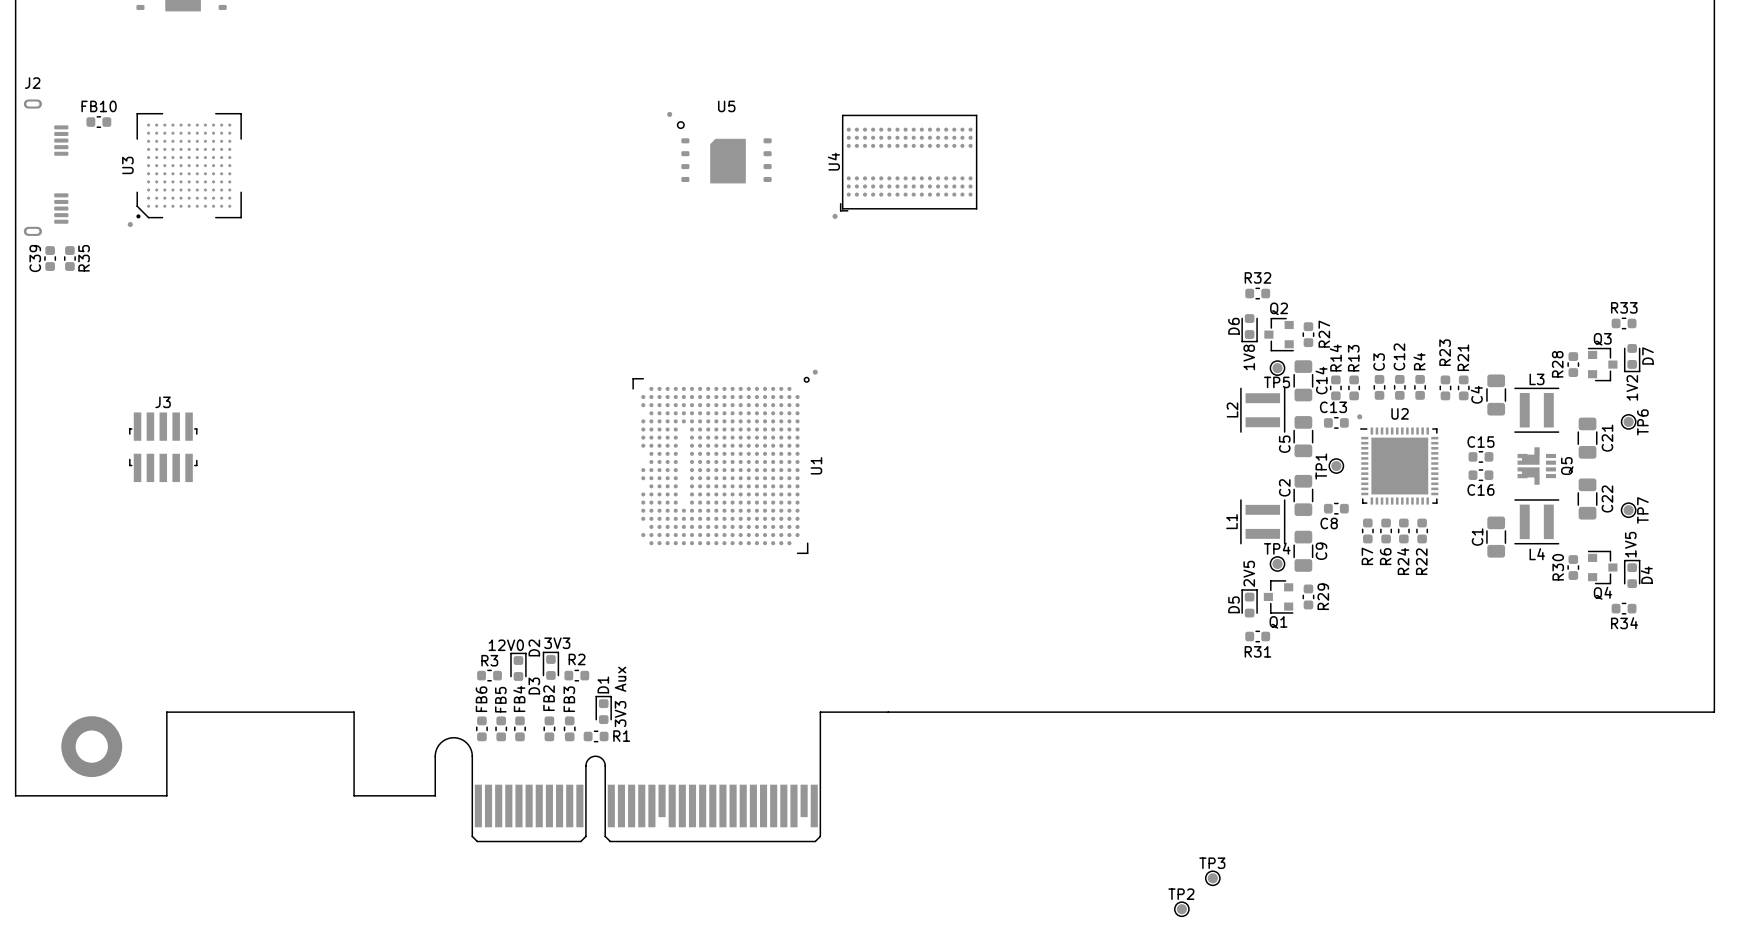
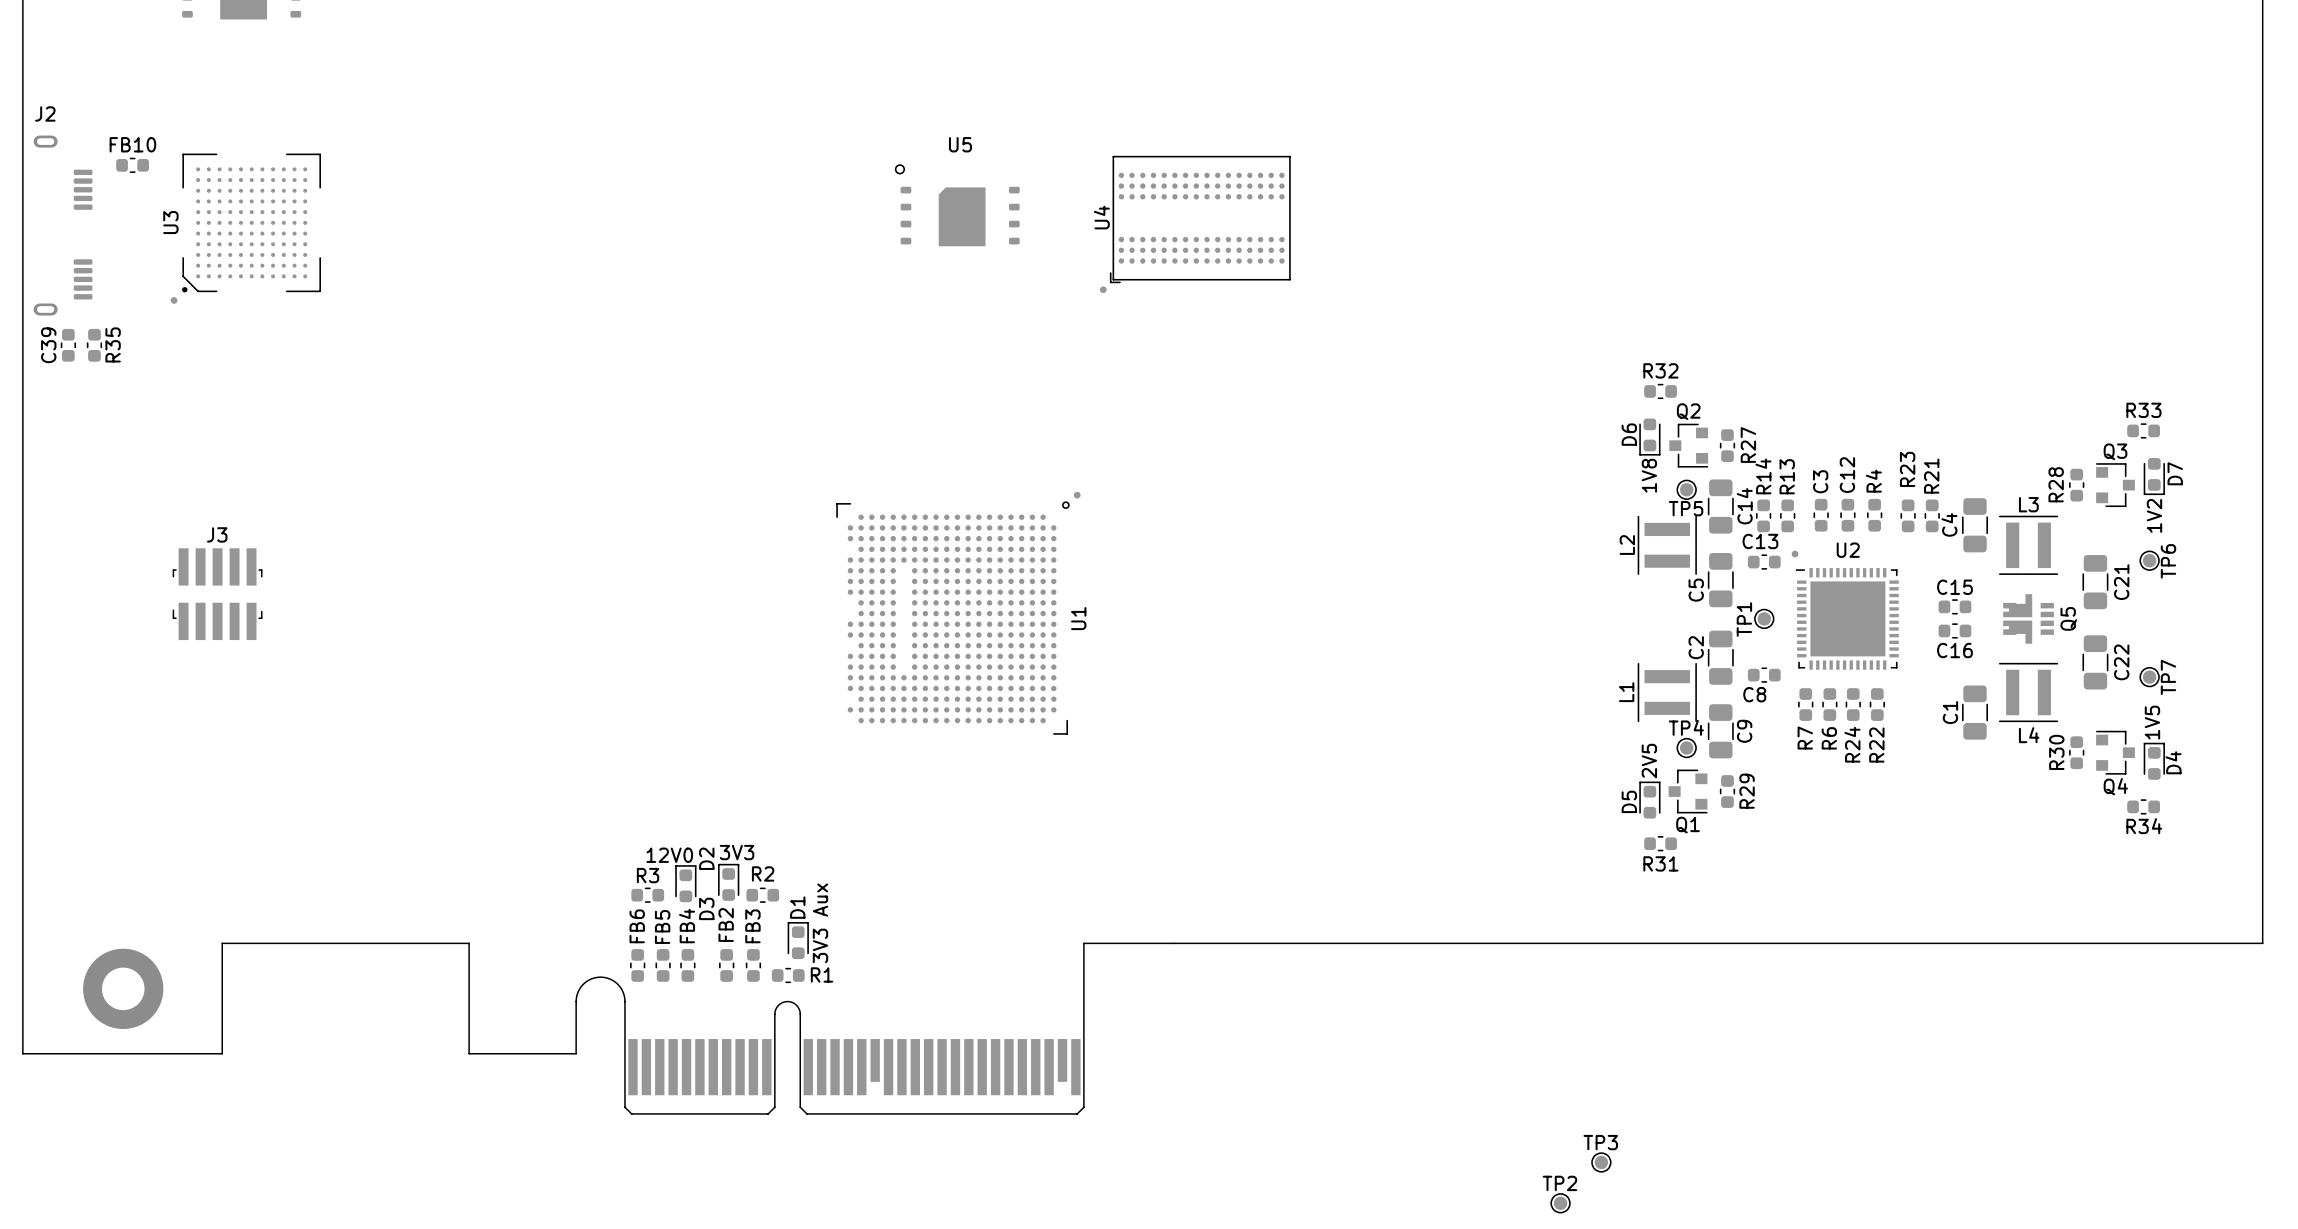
part: (669, 114) -> none

